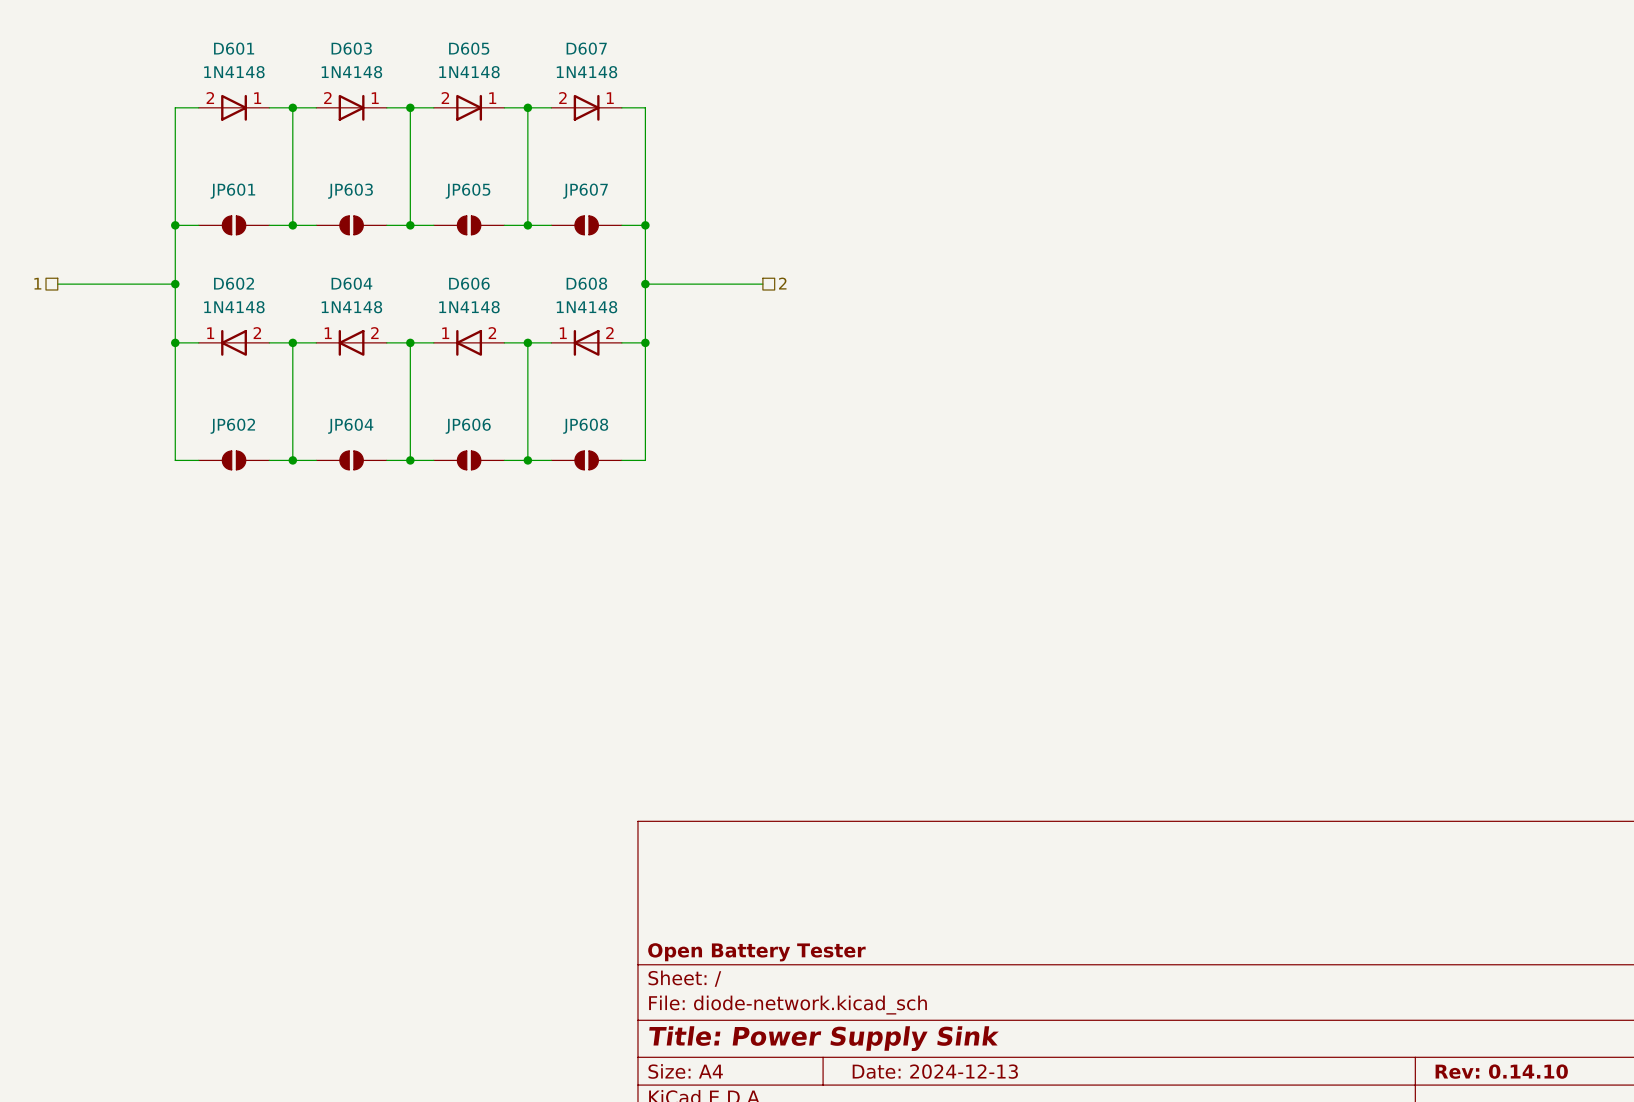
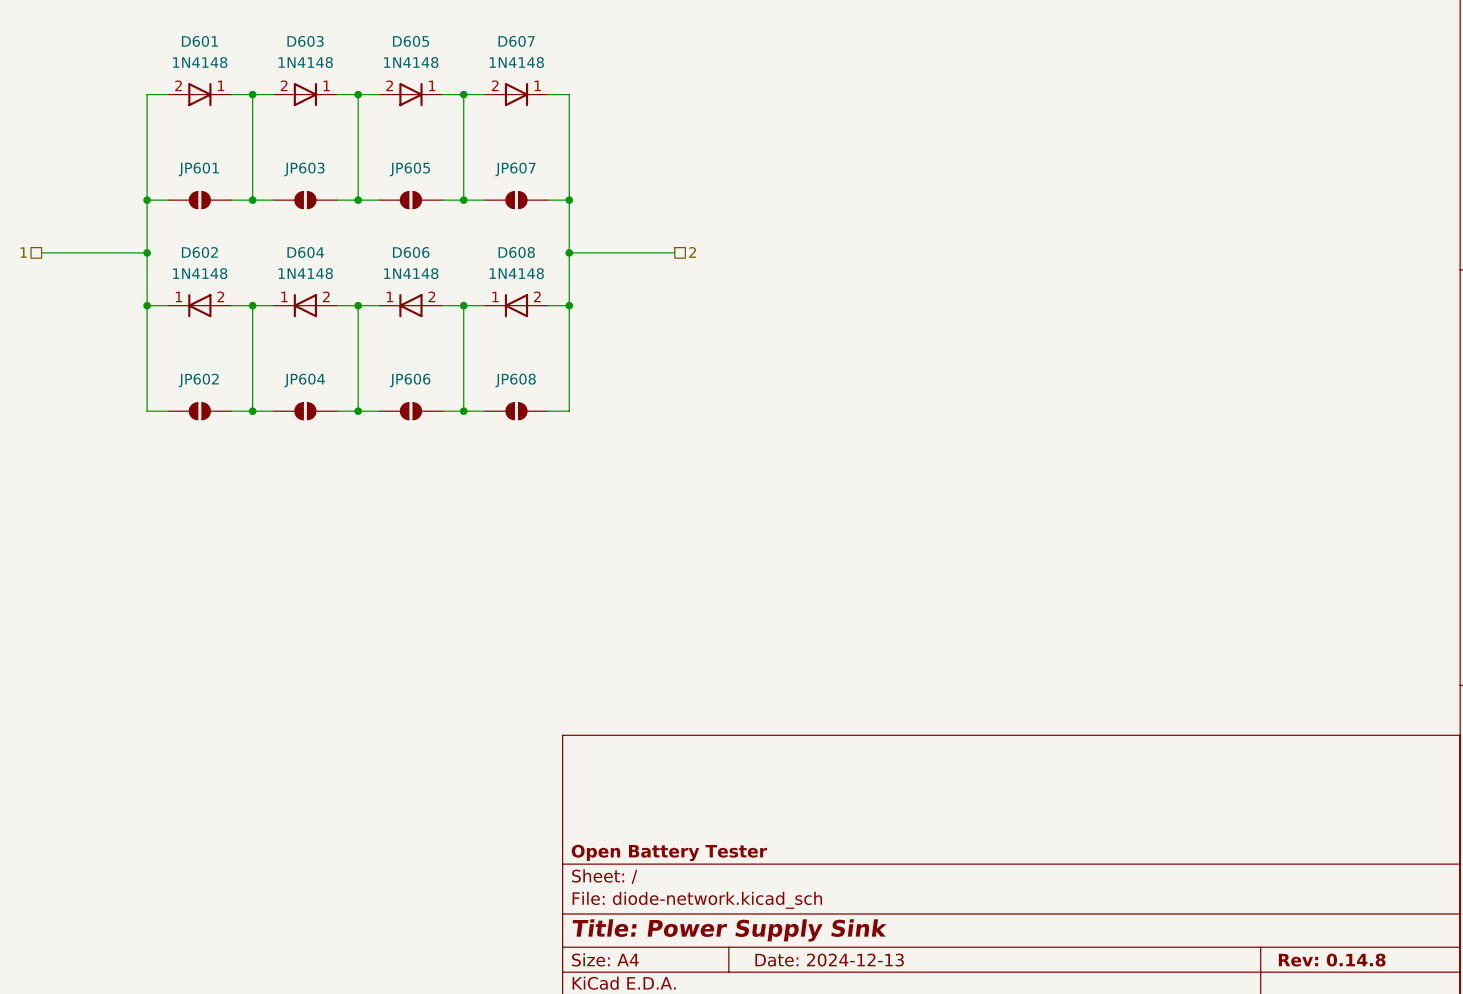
title block: Rev: 0.14.10 (1501, 1071) -> Rev: 0.14.8 (1332, 960)

